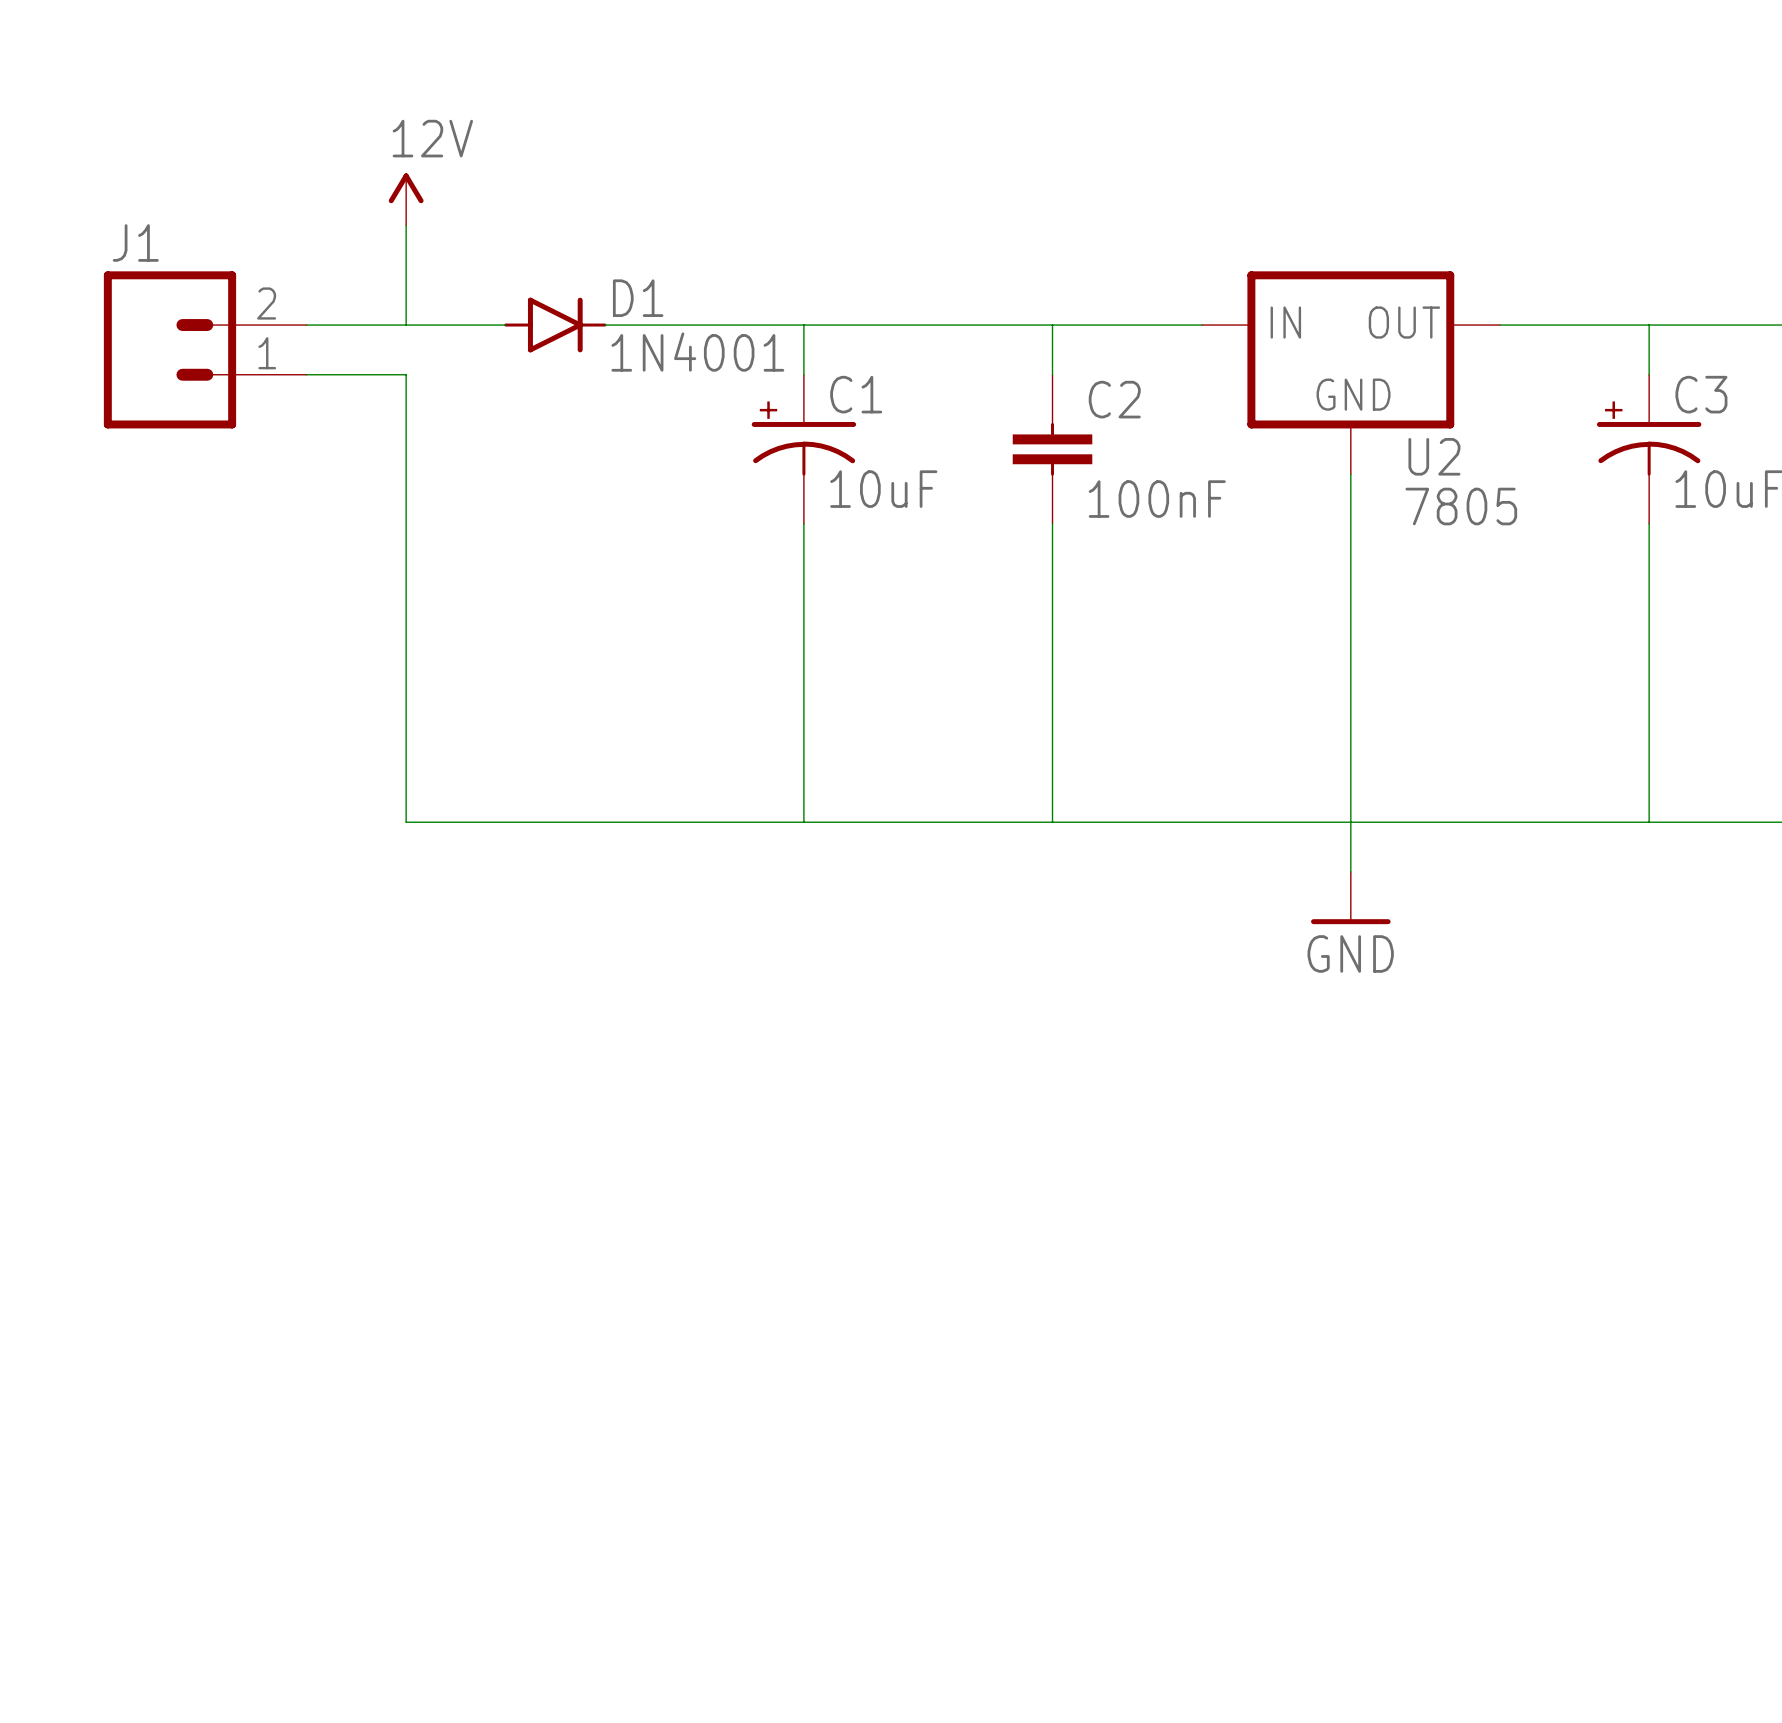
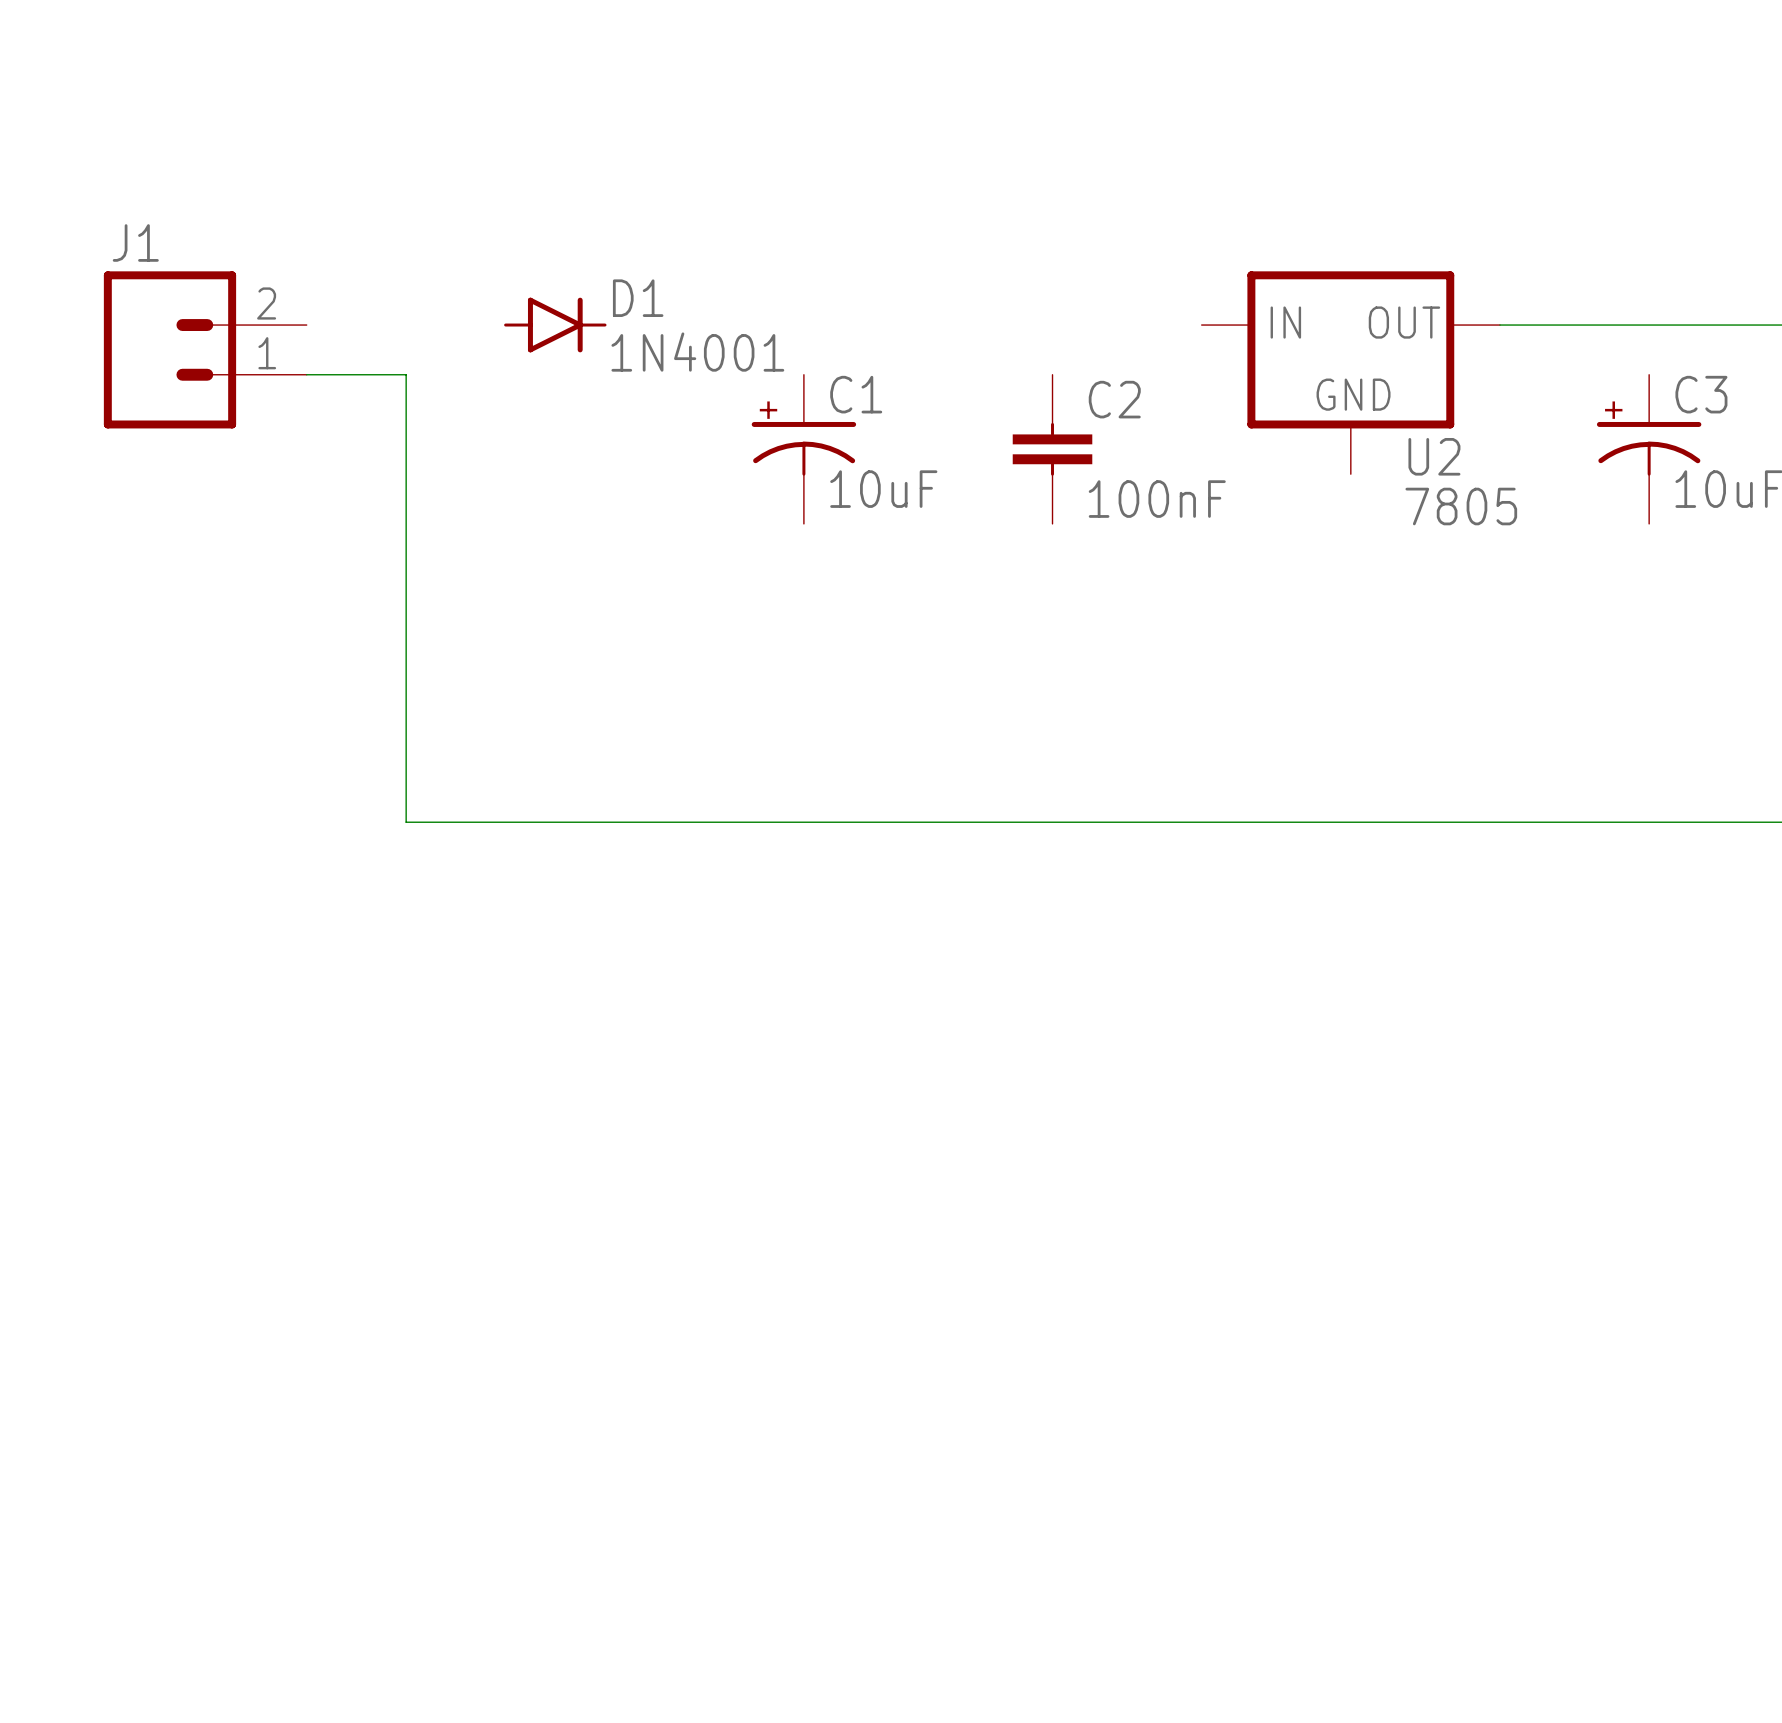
power symbol: 12V (406, 199) -> none
wire: (406, 225) (406, 325) -> none
wire: (306, 325) (505, 325) -> none
wire: (605, 325) (1201, 325) -> none
wire: (803, 325) (803, 374) -> none
wire: (1052, 325) (1052, 374) -> none
wire: (1649, 325) (1649, 374) -> none
wire: (1350, 474) (1350, 871) -> none
wire: (803, 523) (803, 822) -> none
wire: (1052, 523) (1052, 822) -> none
wire: (1649, 523) (1649, 822) -> none
power symbol: GND (1350, 898) -> none

